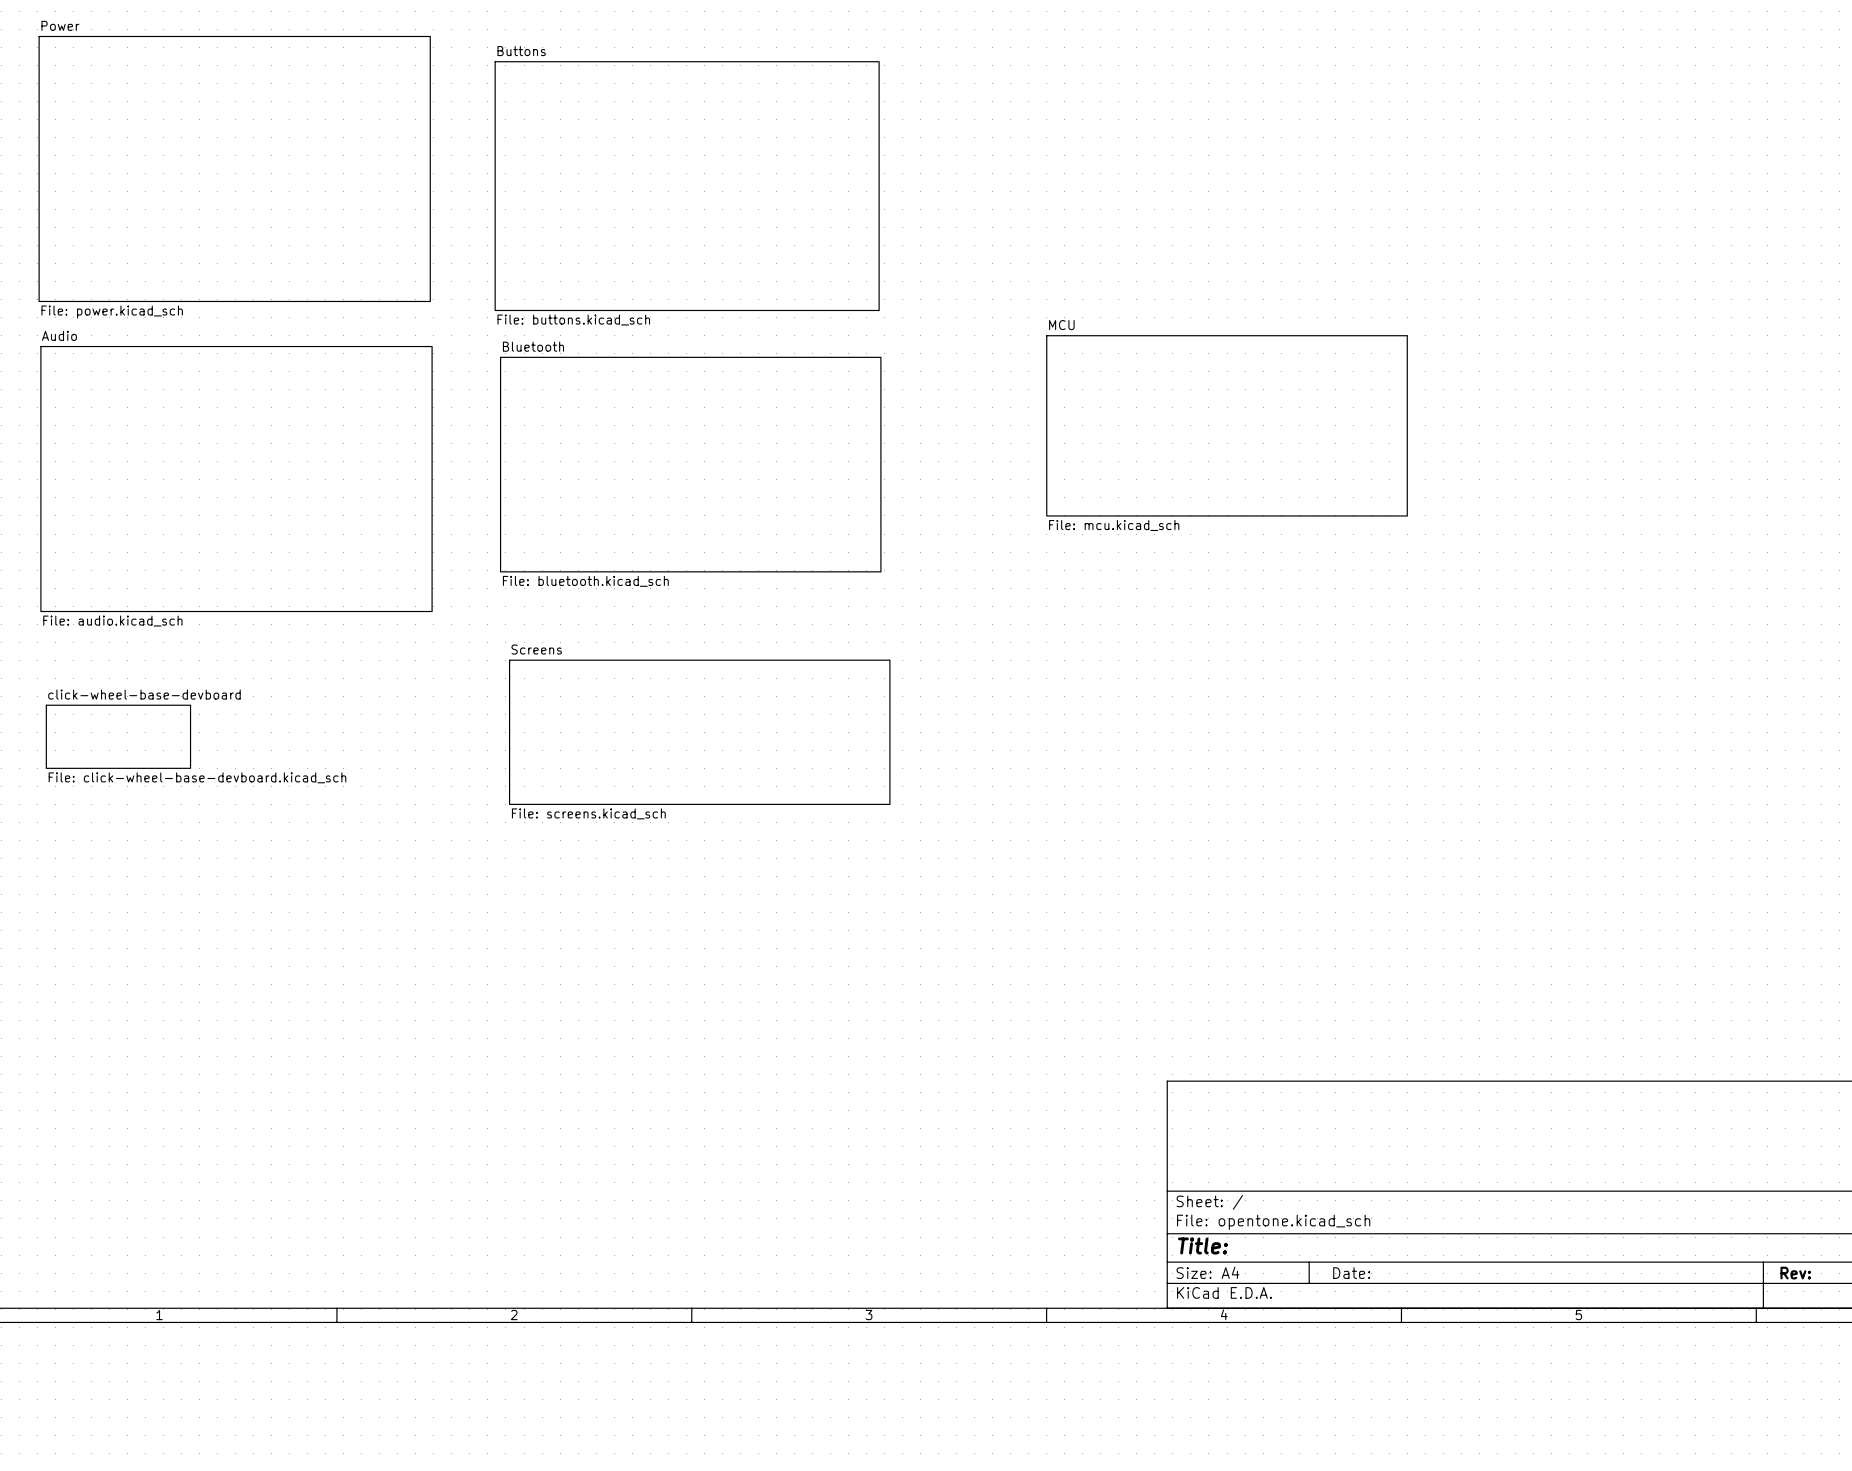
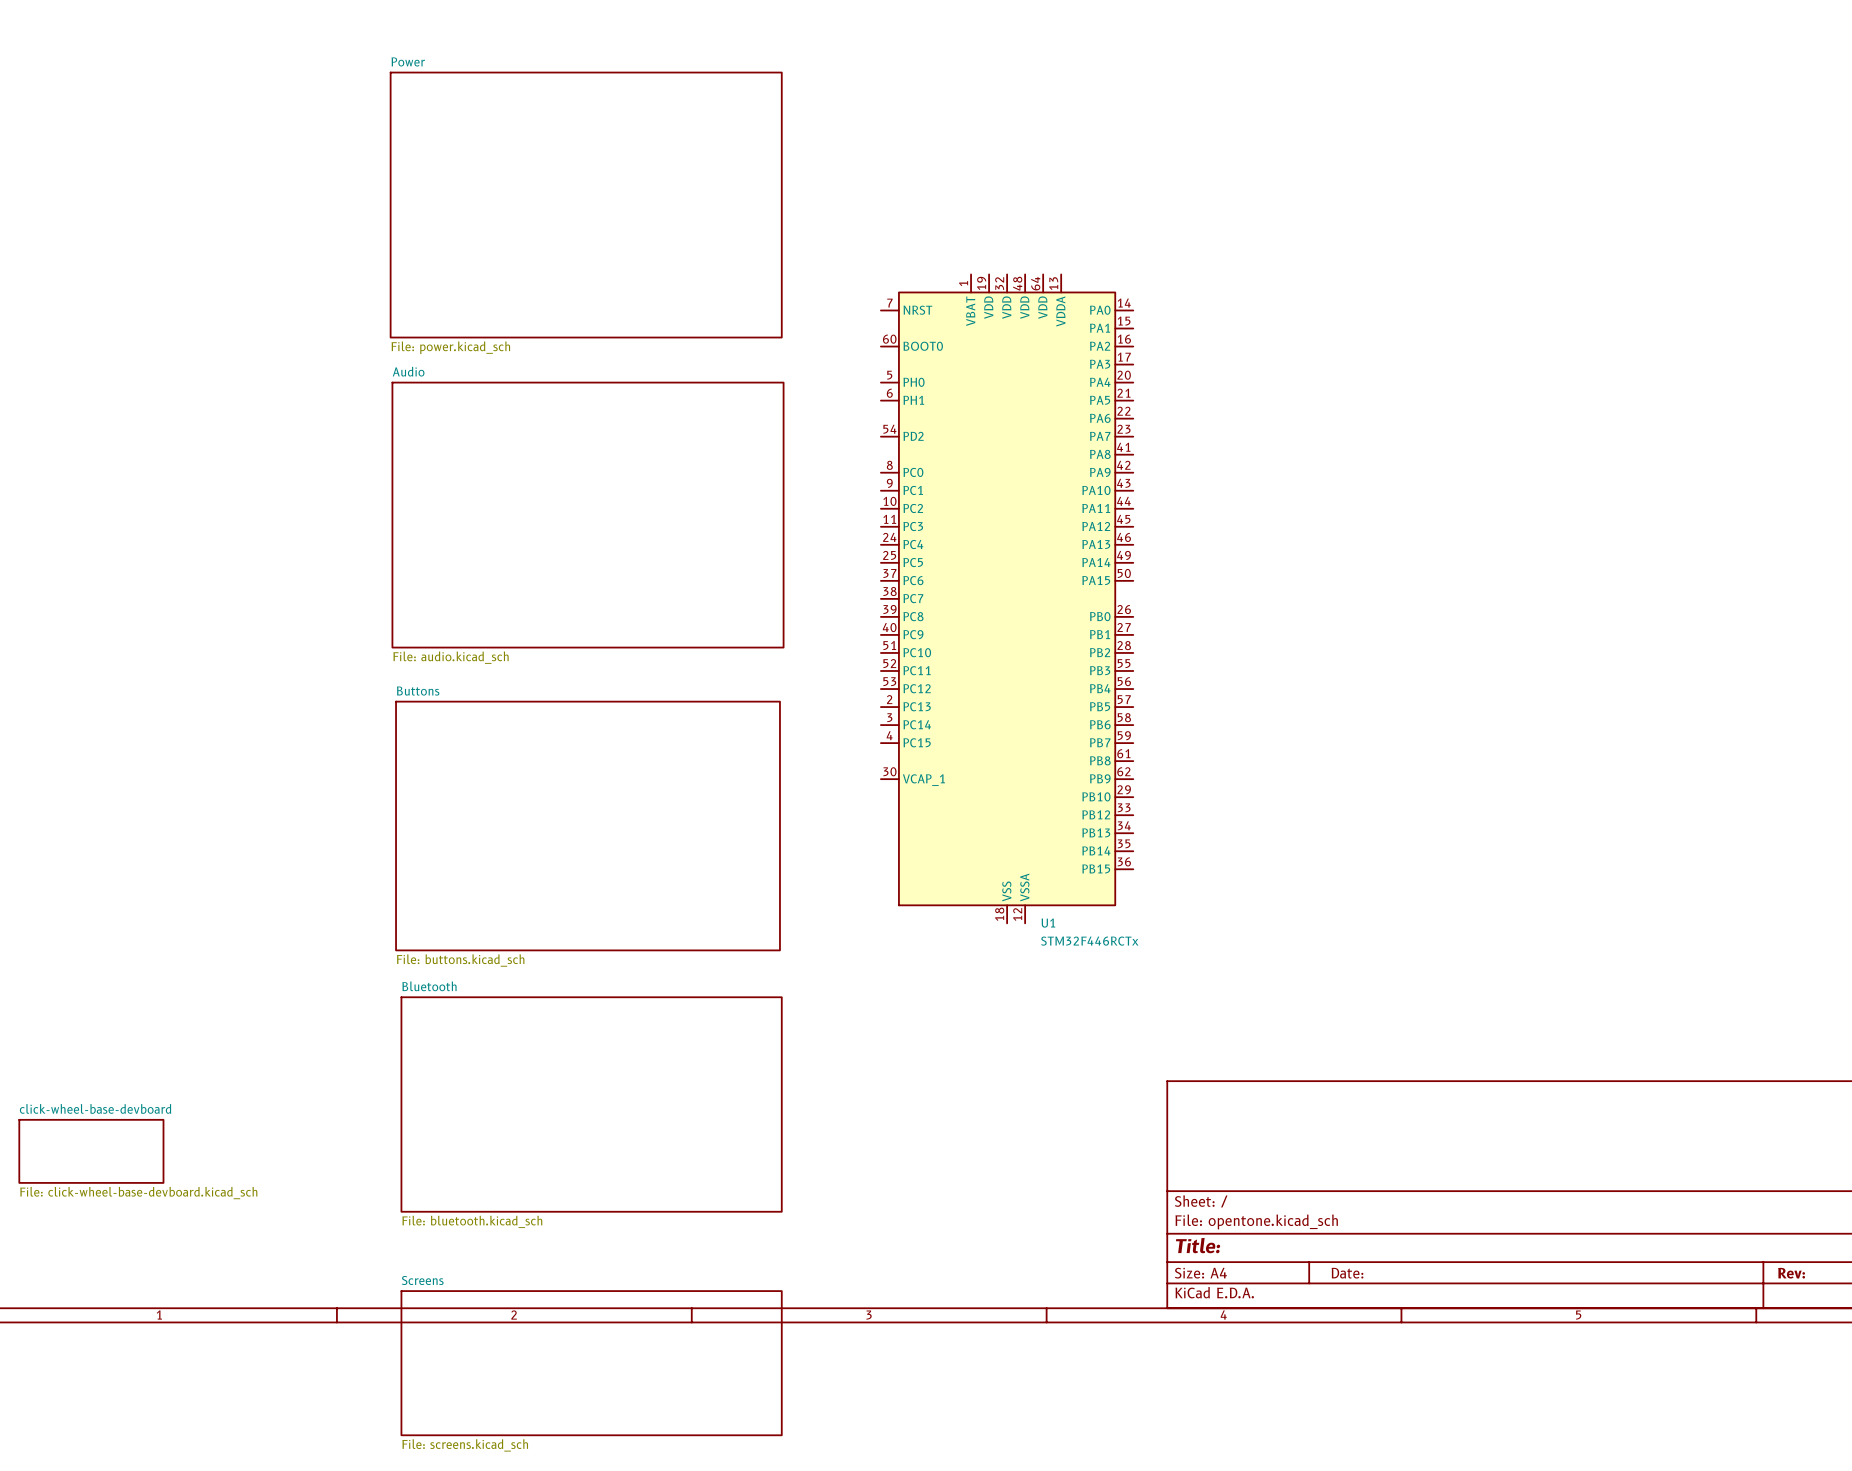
sheet Power: File: power.kicad_sch (234, 168) -> none
sheet Buttons: File: buttons.kicad_sch (687, 186) -> none
sheet Power: none -> File: power.kicad_sch (586, 205)
sheet MCU: File: mcu.kicad_sch (1227, 425) -> none
sheet Bluetooth: File: bluetooth.kicad_sch (690, 464) -> none
sheet Audio: File: audio.kicad_sch (236, 479) -> none
sheet Audio: none -> File: audio.kicad_sch (588, 515)
U1: none -> STM32F446RCTx (1007, 598)
sheet Screens: File: screens.kicad_sch (699, 732) -> none
sheet click-wheel-base-devboard: File: click-wheel-base-devboard.kicad_sch (118, 736) -> none
sheet Buttons: none -> File: buttons.kicad_sch (588, 826)
sheet Bluetooth: none -> File: bluetooth.kicad_sch (591, 1104)
sheet click-wheel-base-devboard: none -> File: click-wheel-base-devboard.kicad_sch (91, 1151)
sheet Screens: none -> File: screens.kicad_sch (591, 1363)

